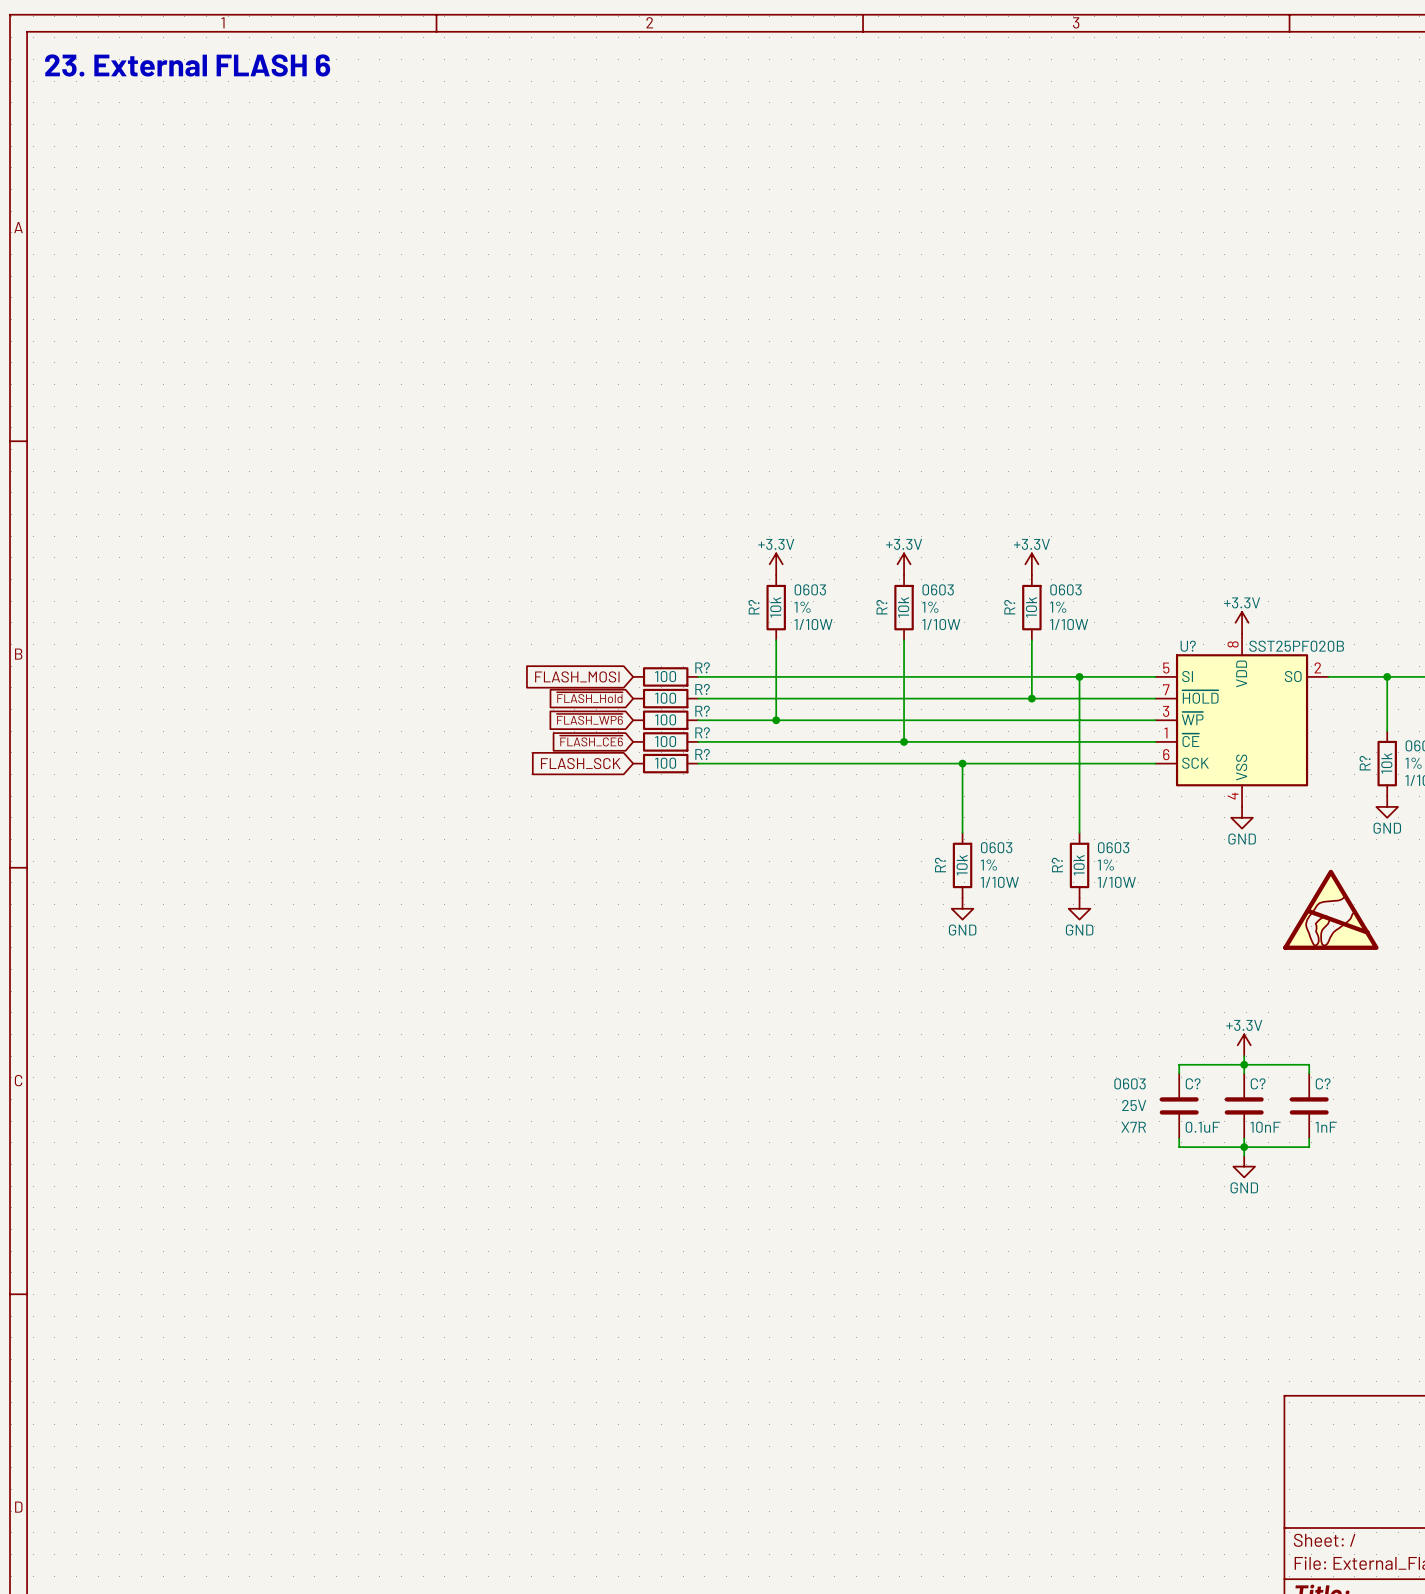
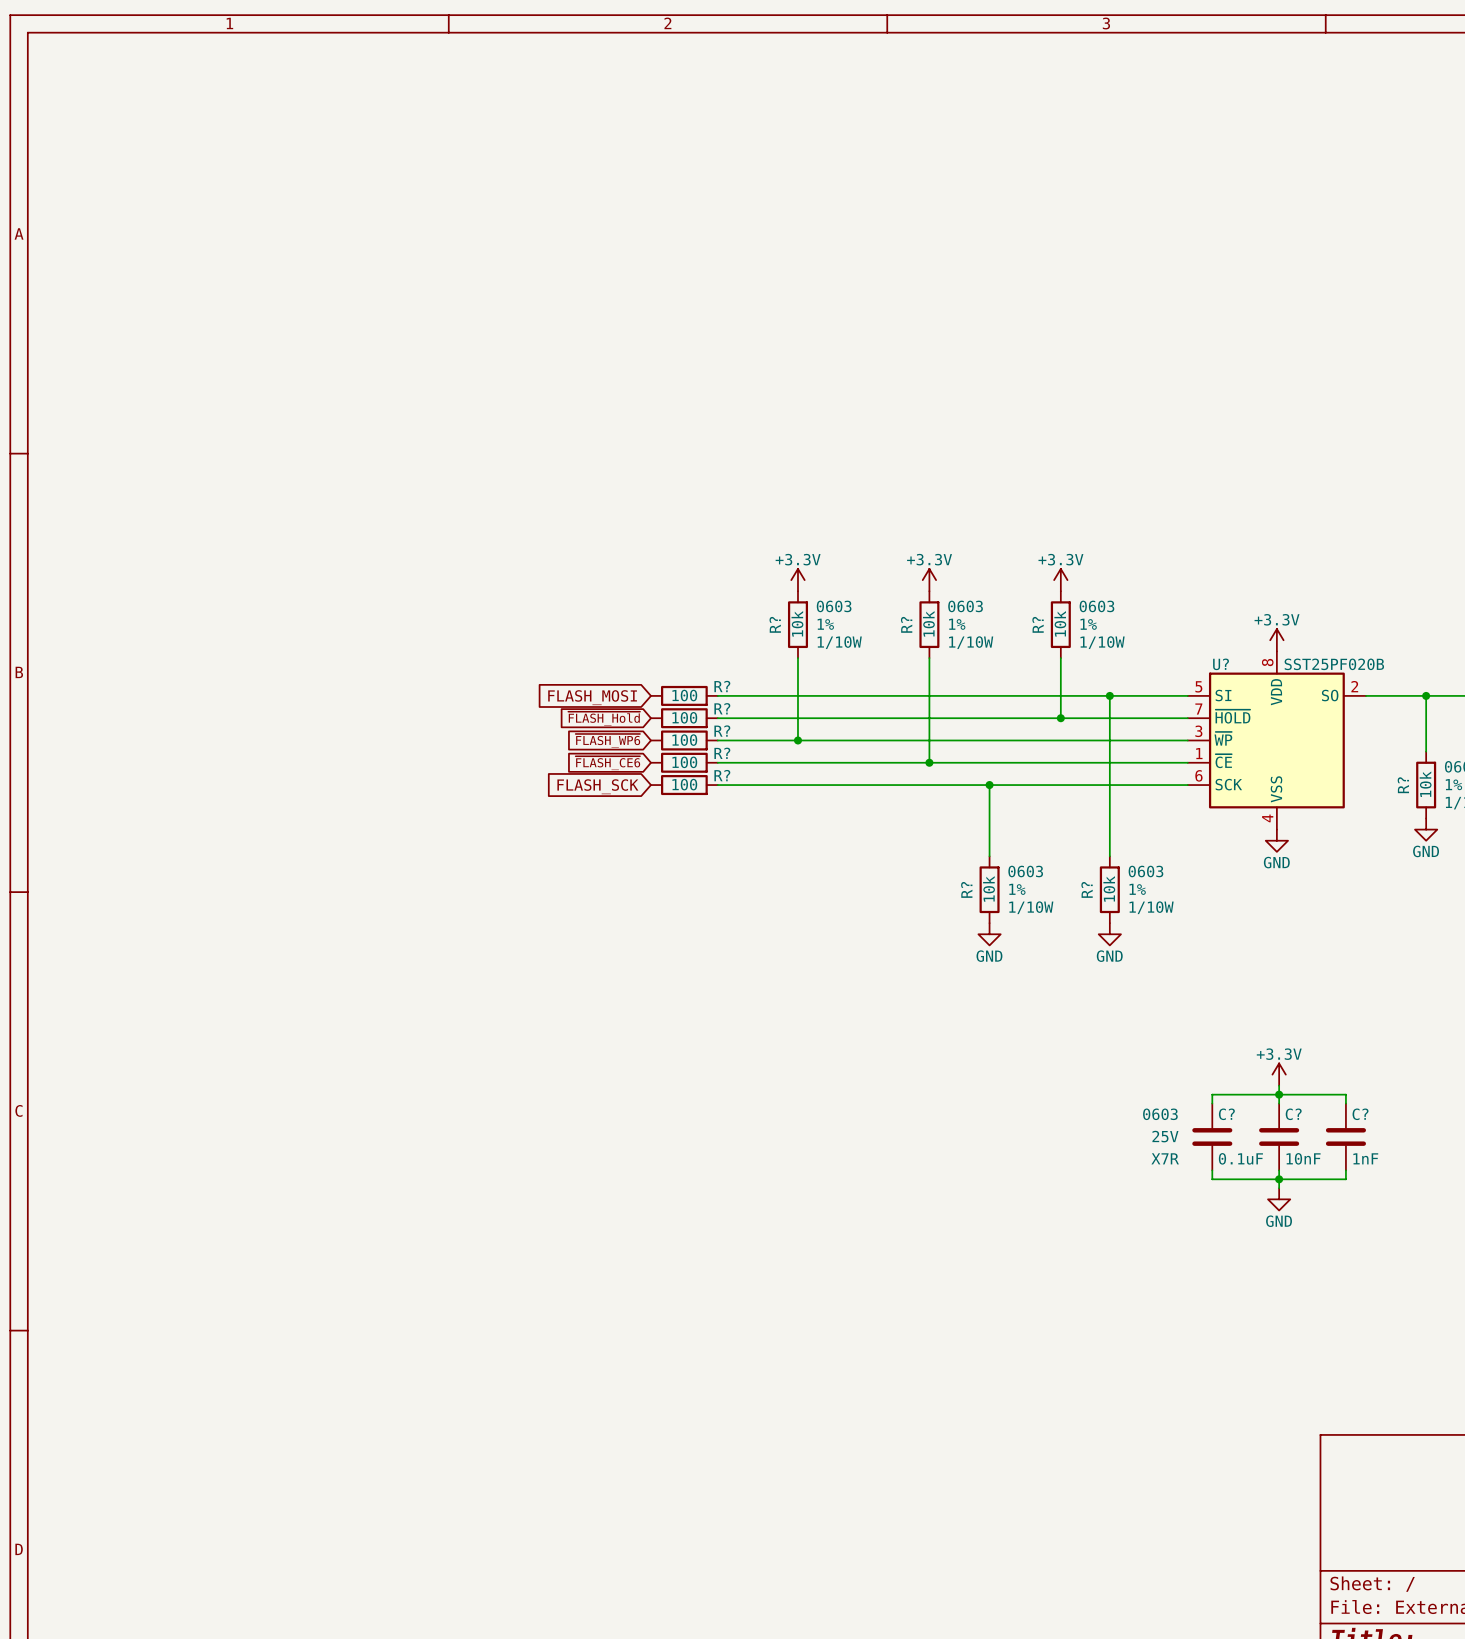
text: 23. External FLASH 6 (187, 65) -> none
power symbol: (1330, 909) -> none

